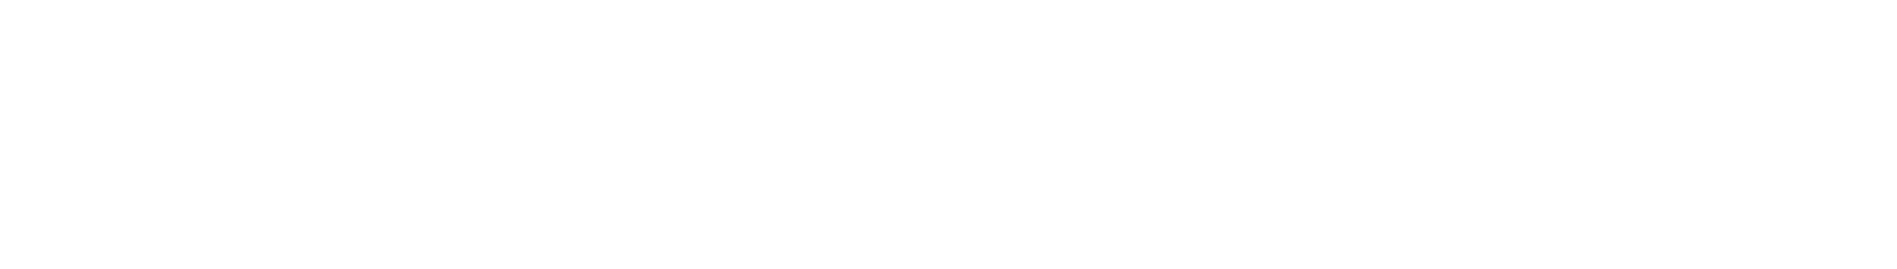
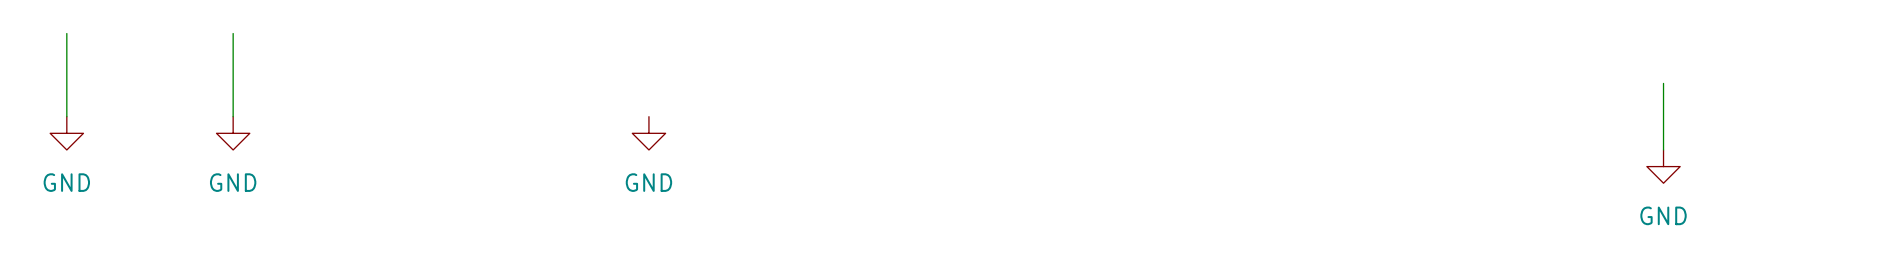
wire: none -> (66, 33) (66, 116)
wire: none -> (233, 33) (233, 116)
wire: none -> (1663, 83) (1663, 149)
power symbol: none -> GND (66, 133)
power symbol: none -> GND (233, 133)
power symbol: none -> GND (648, 133)
power symbol: none -> GND (1663, 166)

